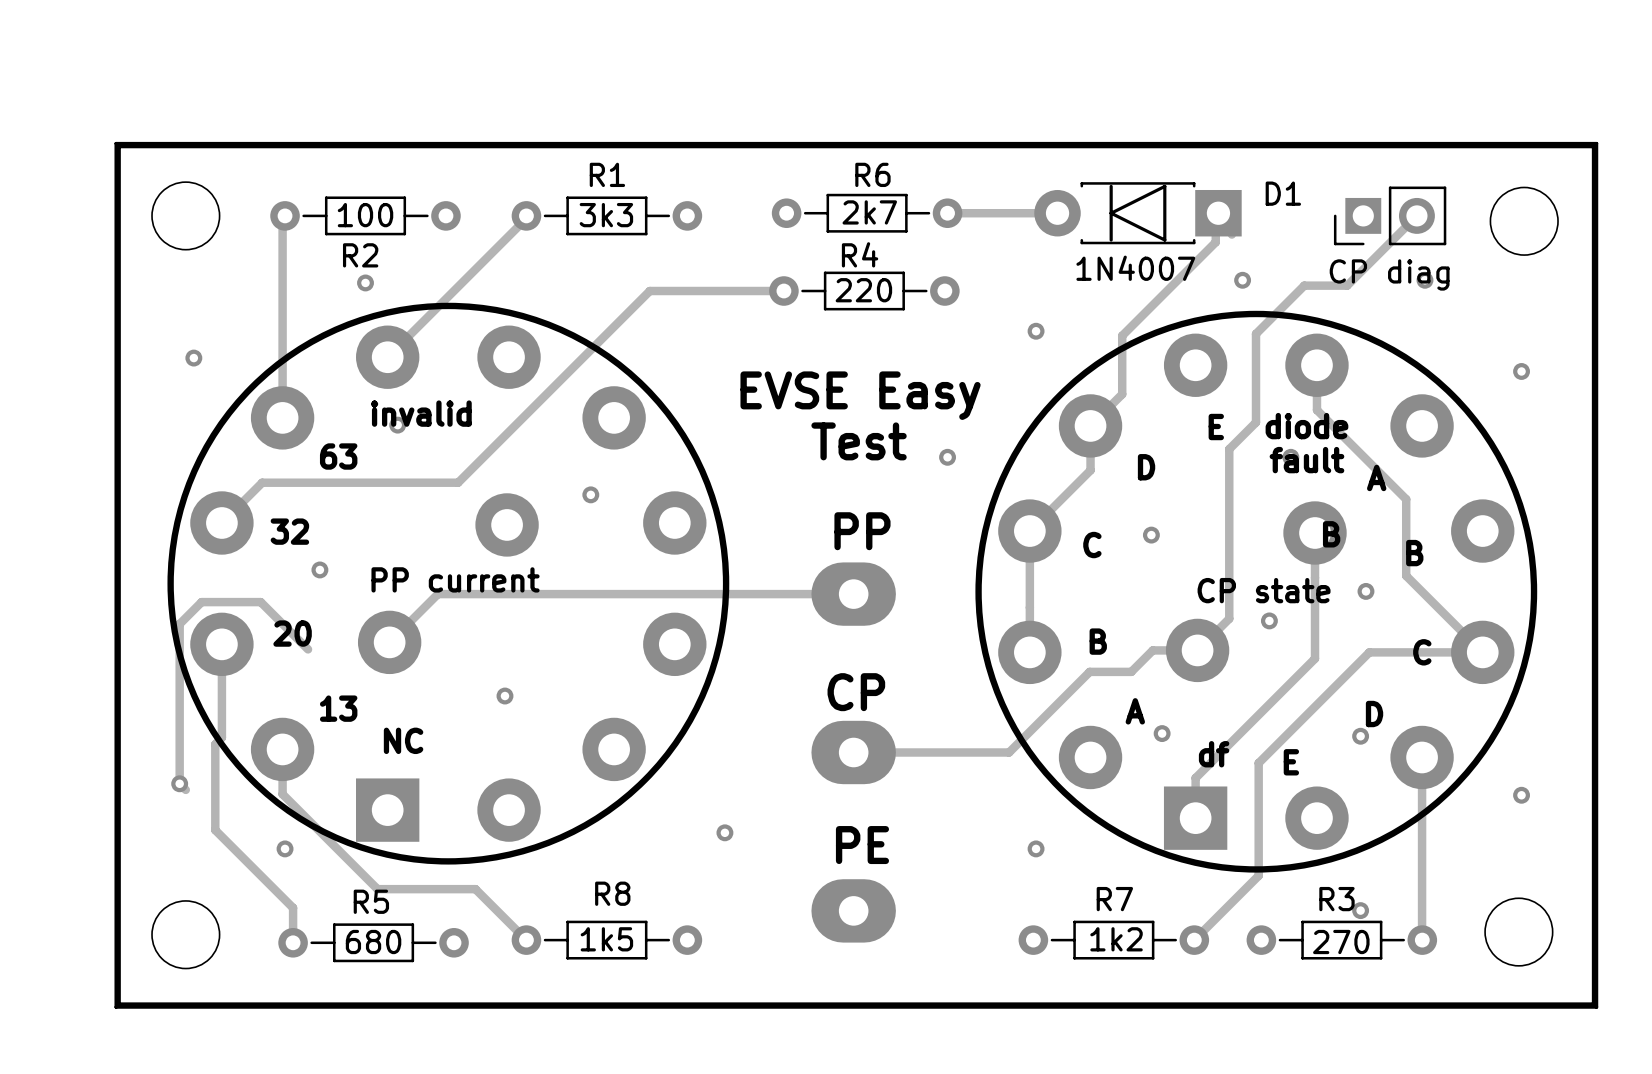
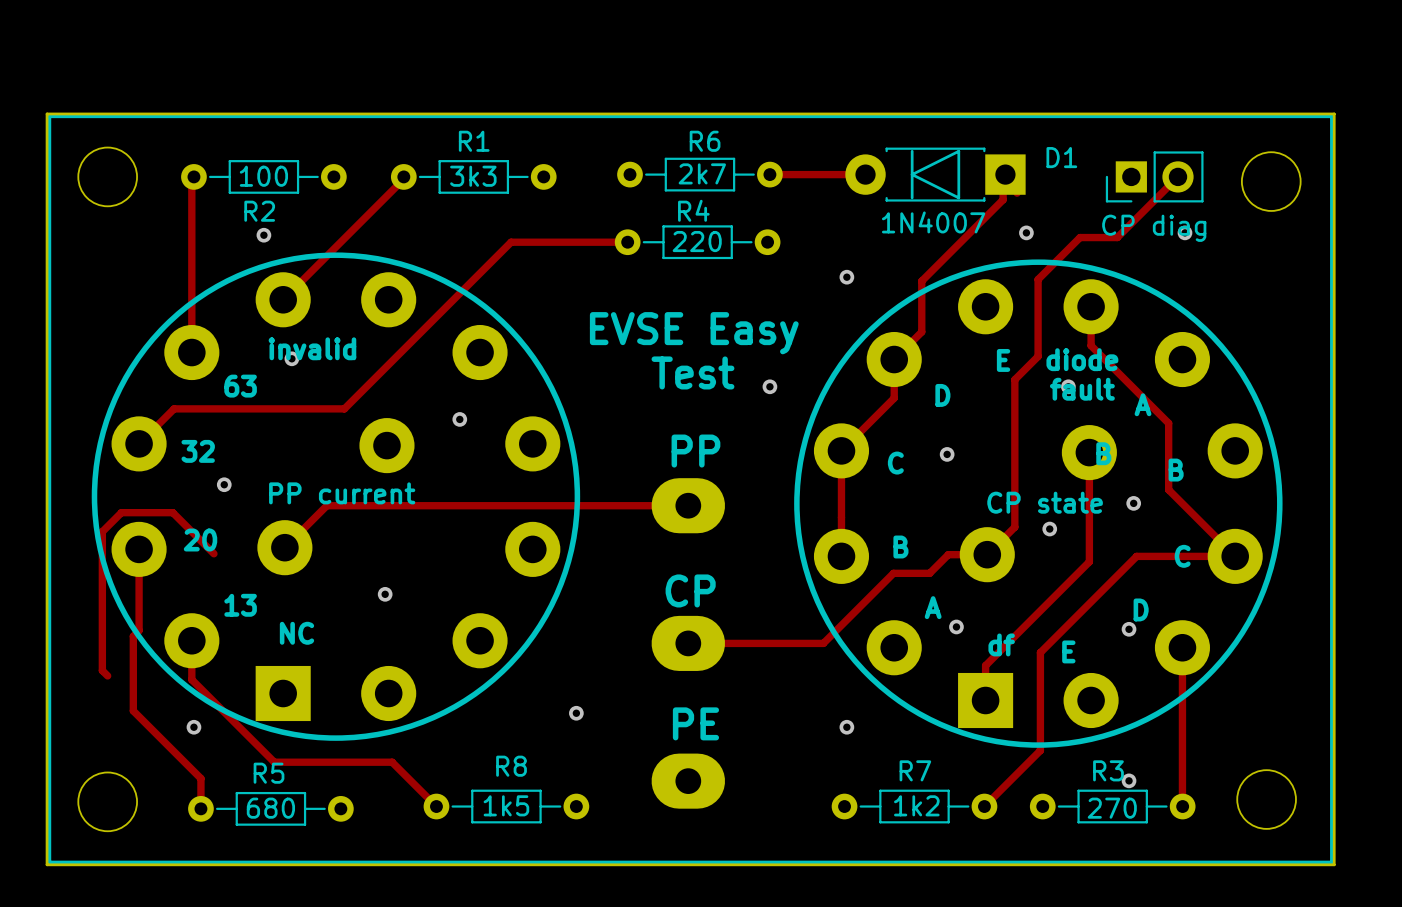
via: (193, 358) -> none
via: (1521, 371) -> none
via: (179, 783) -> none
via: (1521, 795) -> none
track: (475, 889) (526, 940) -> (359, 762) (392, 762) (436, 806)
R8 position: (606, 940) -> (506, 806)

